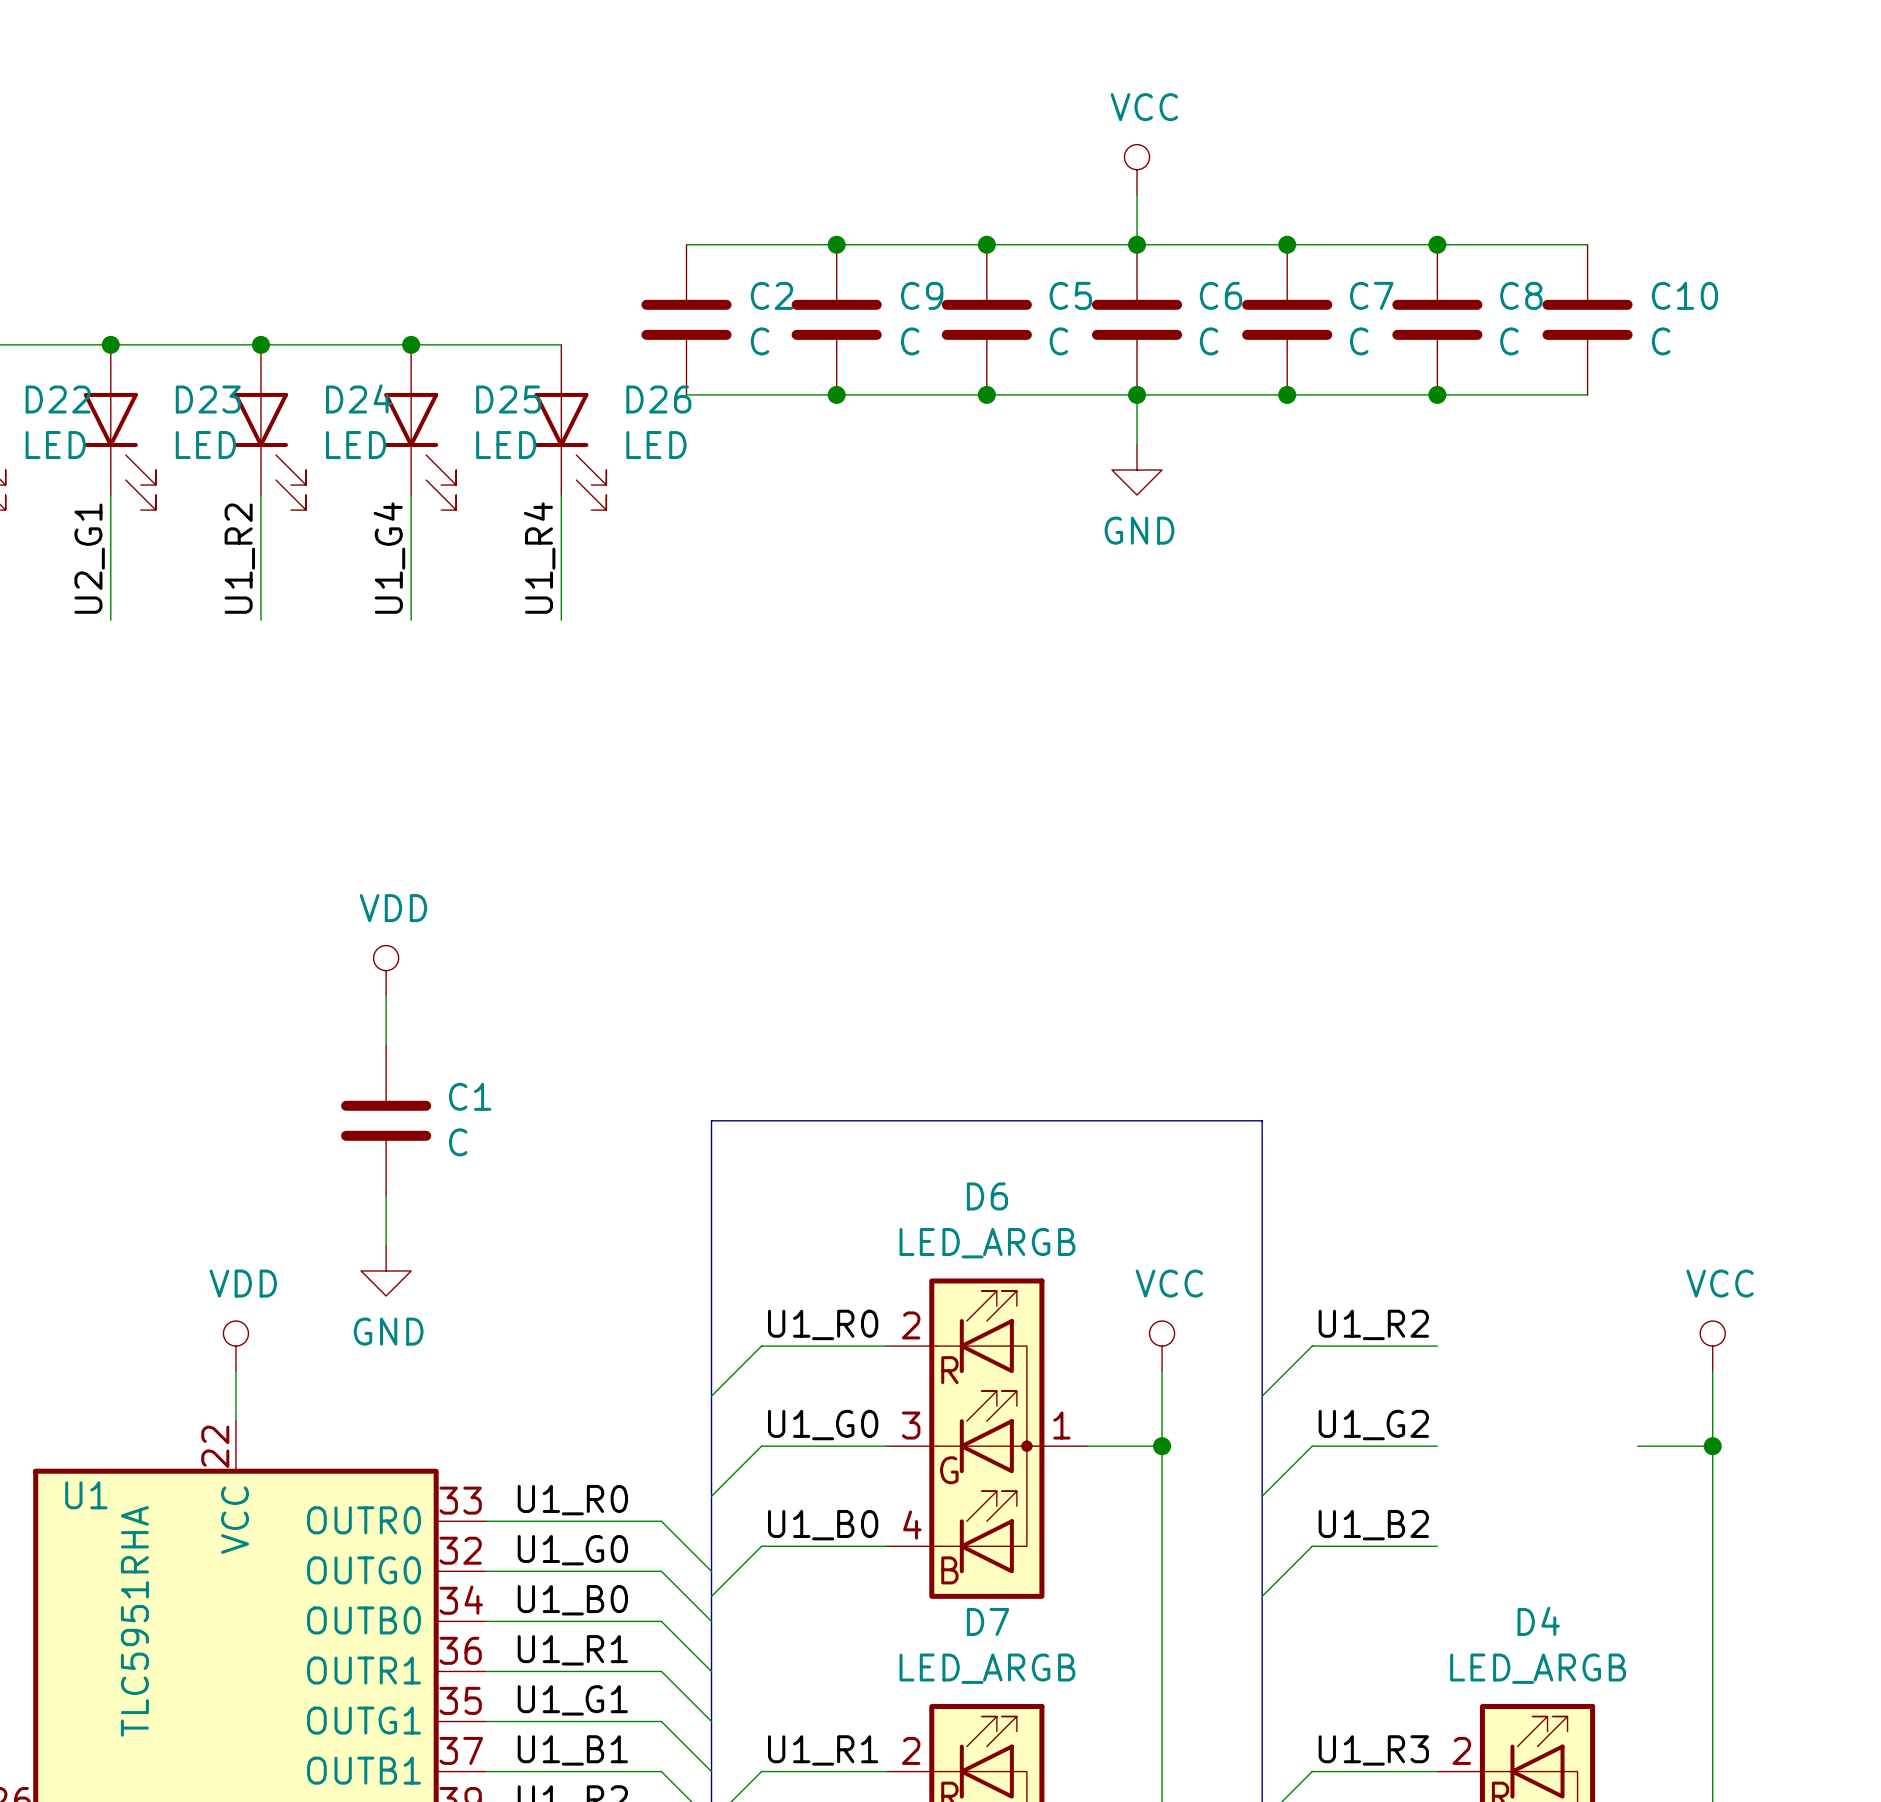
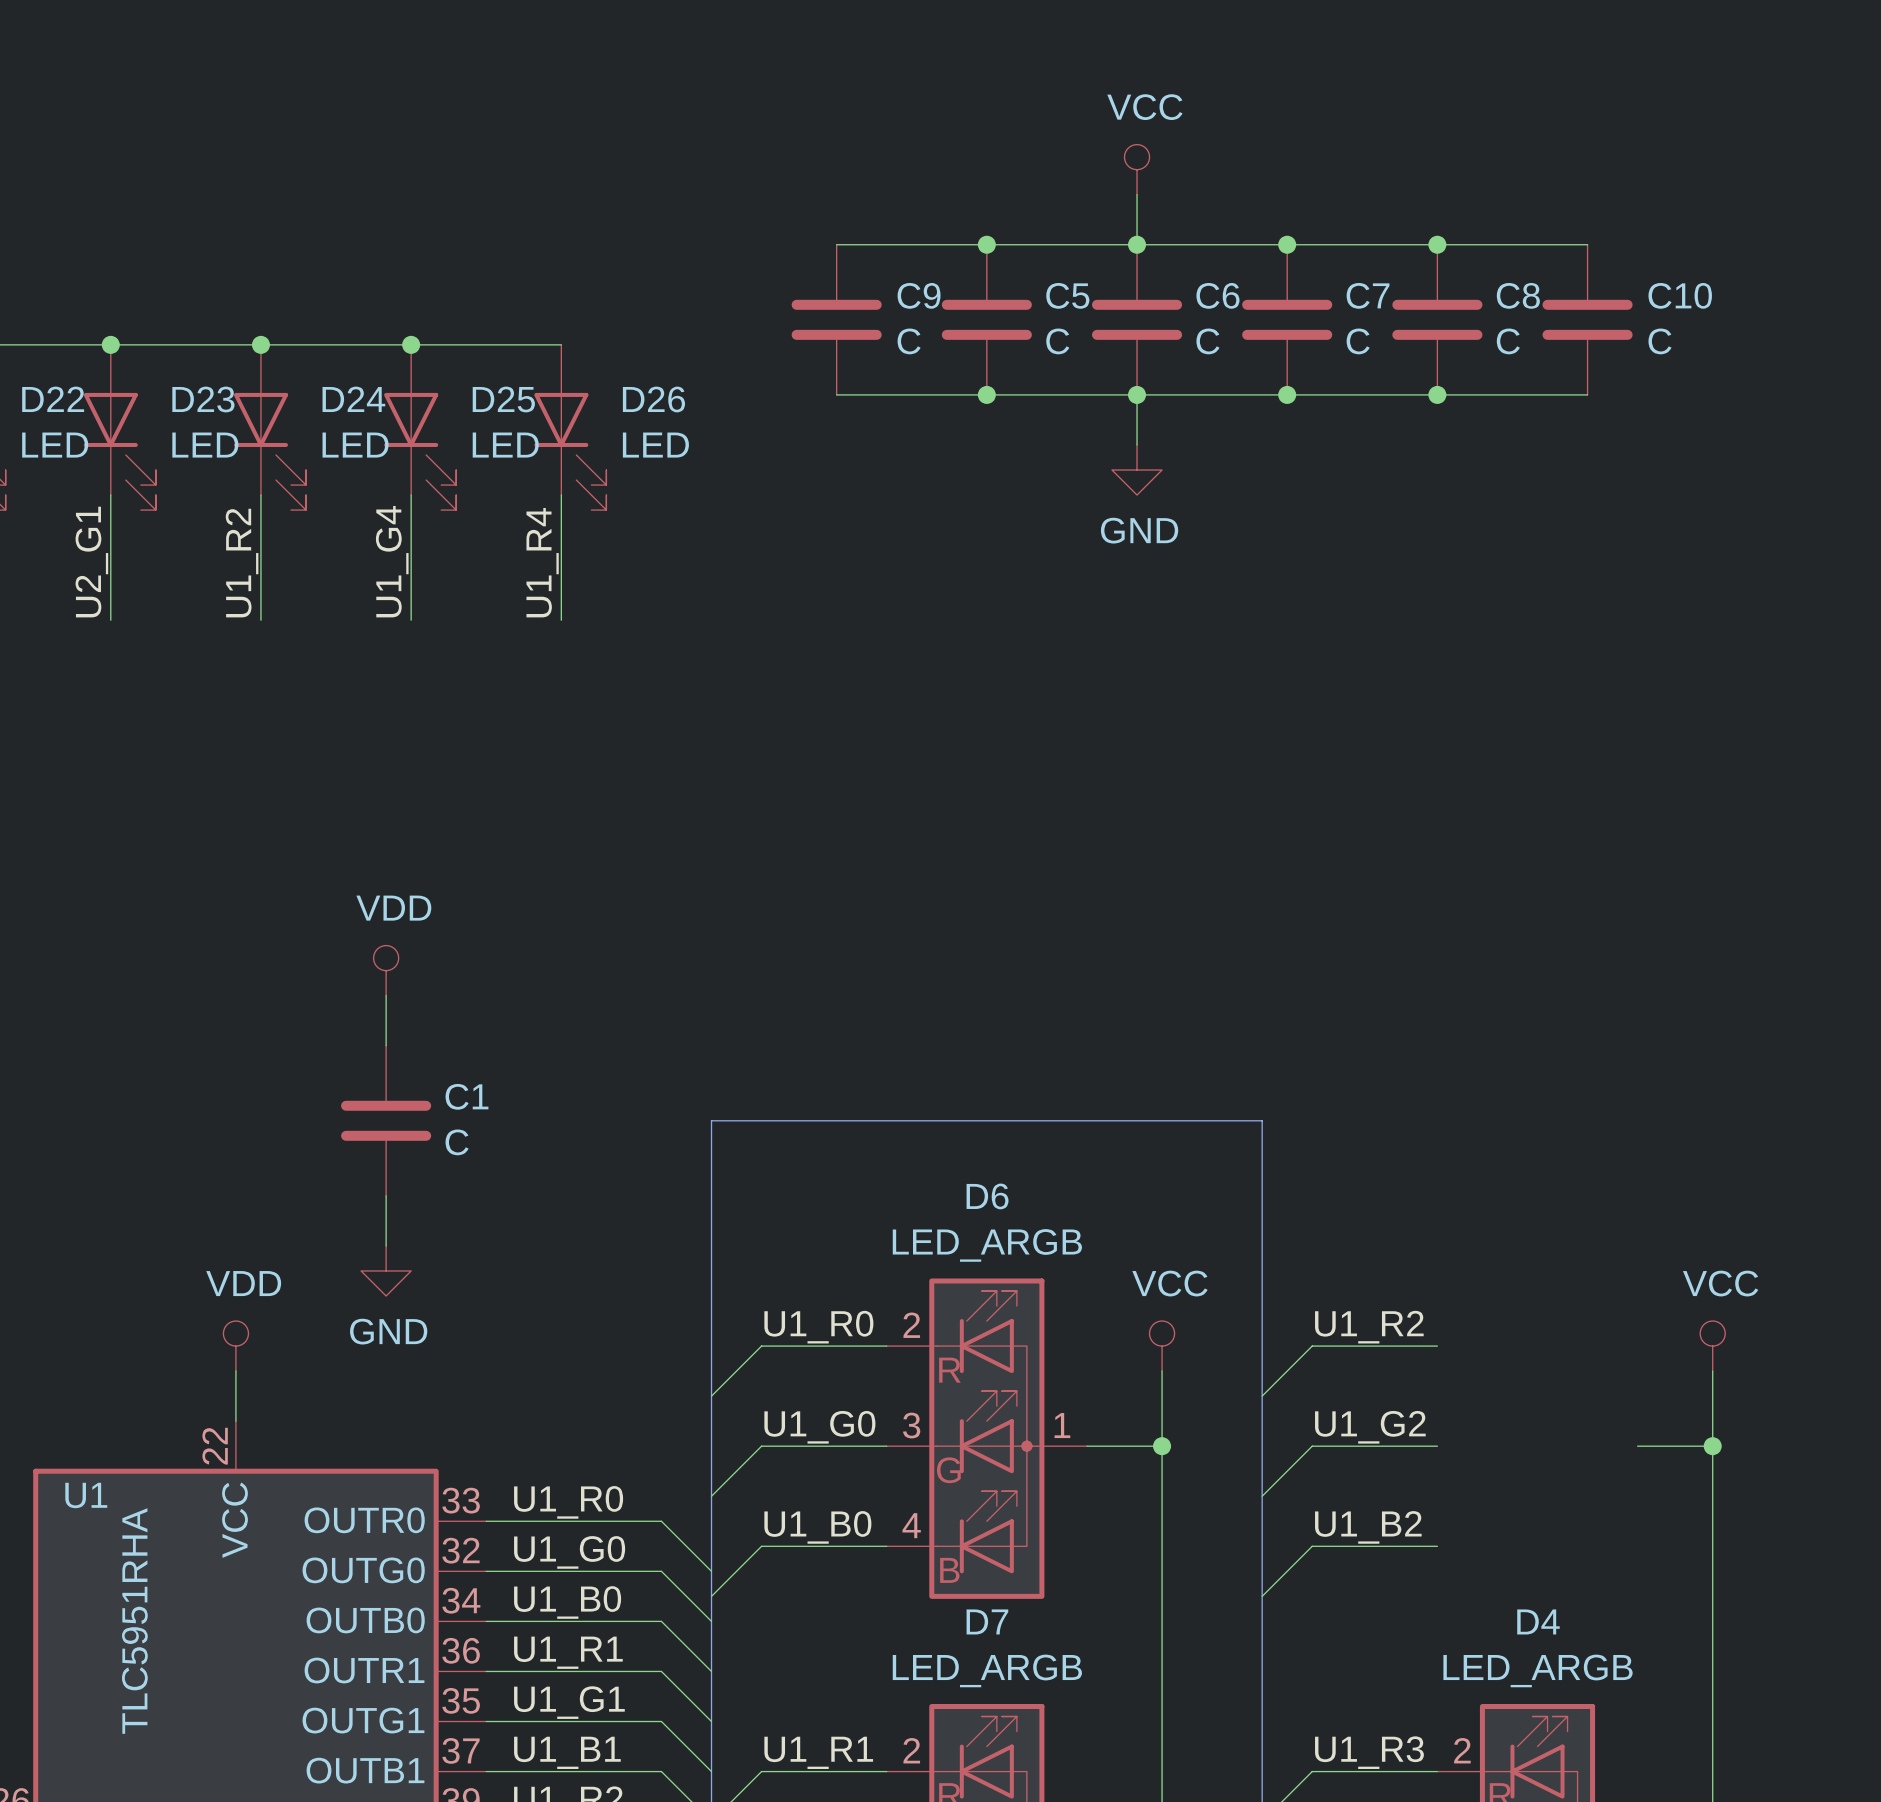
wire: (686, 244) (836, 244) -> none
junction: (836, 244) -> none
C2: C (686, 319) -> none
wire: (686, 394) (836, 394) -> none
junction: (836, 394) -> none

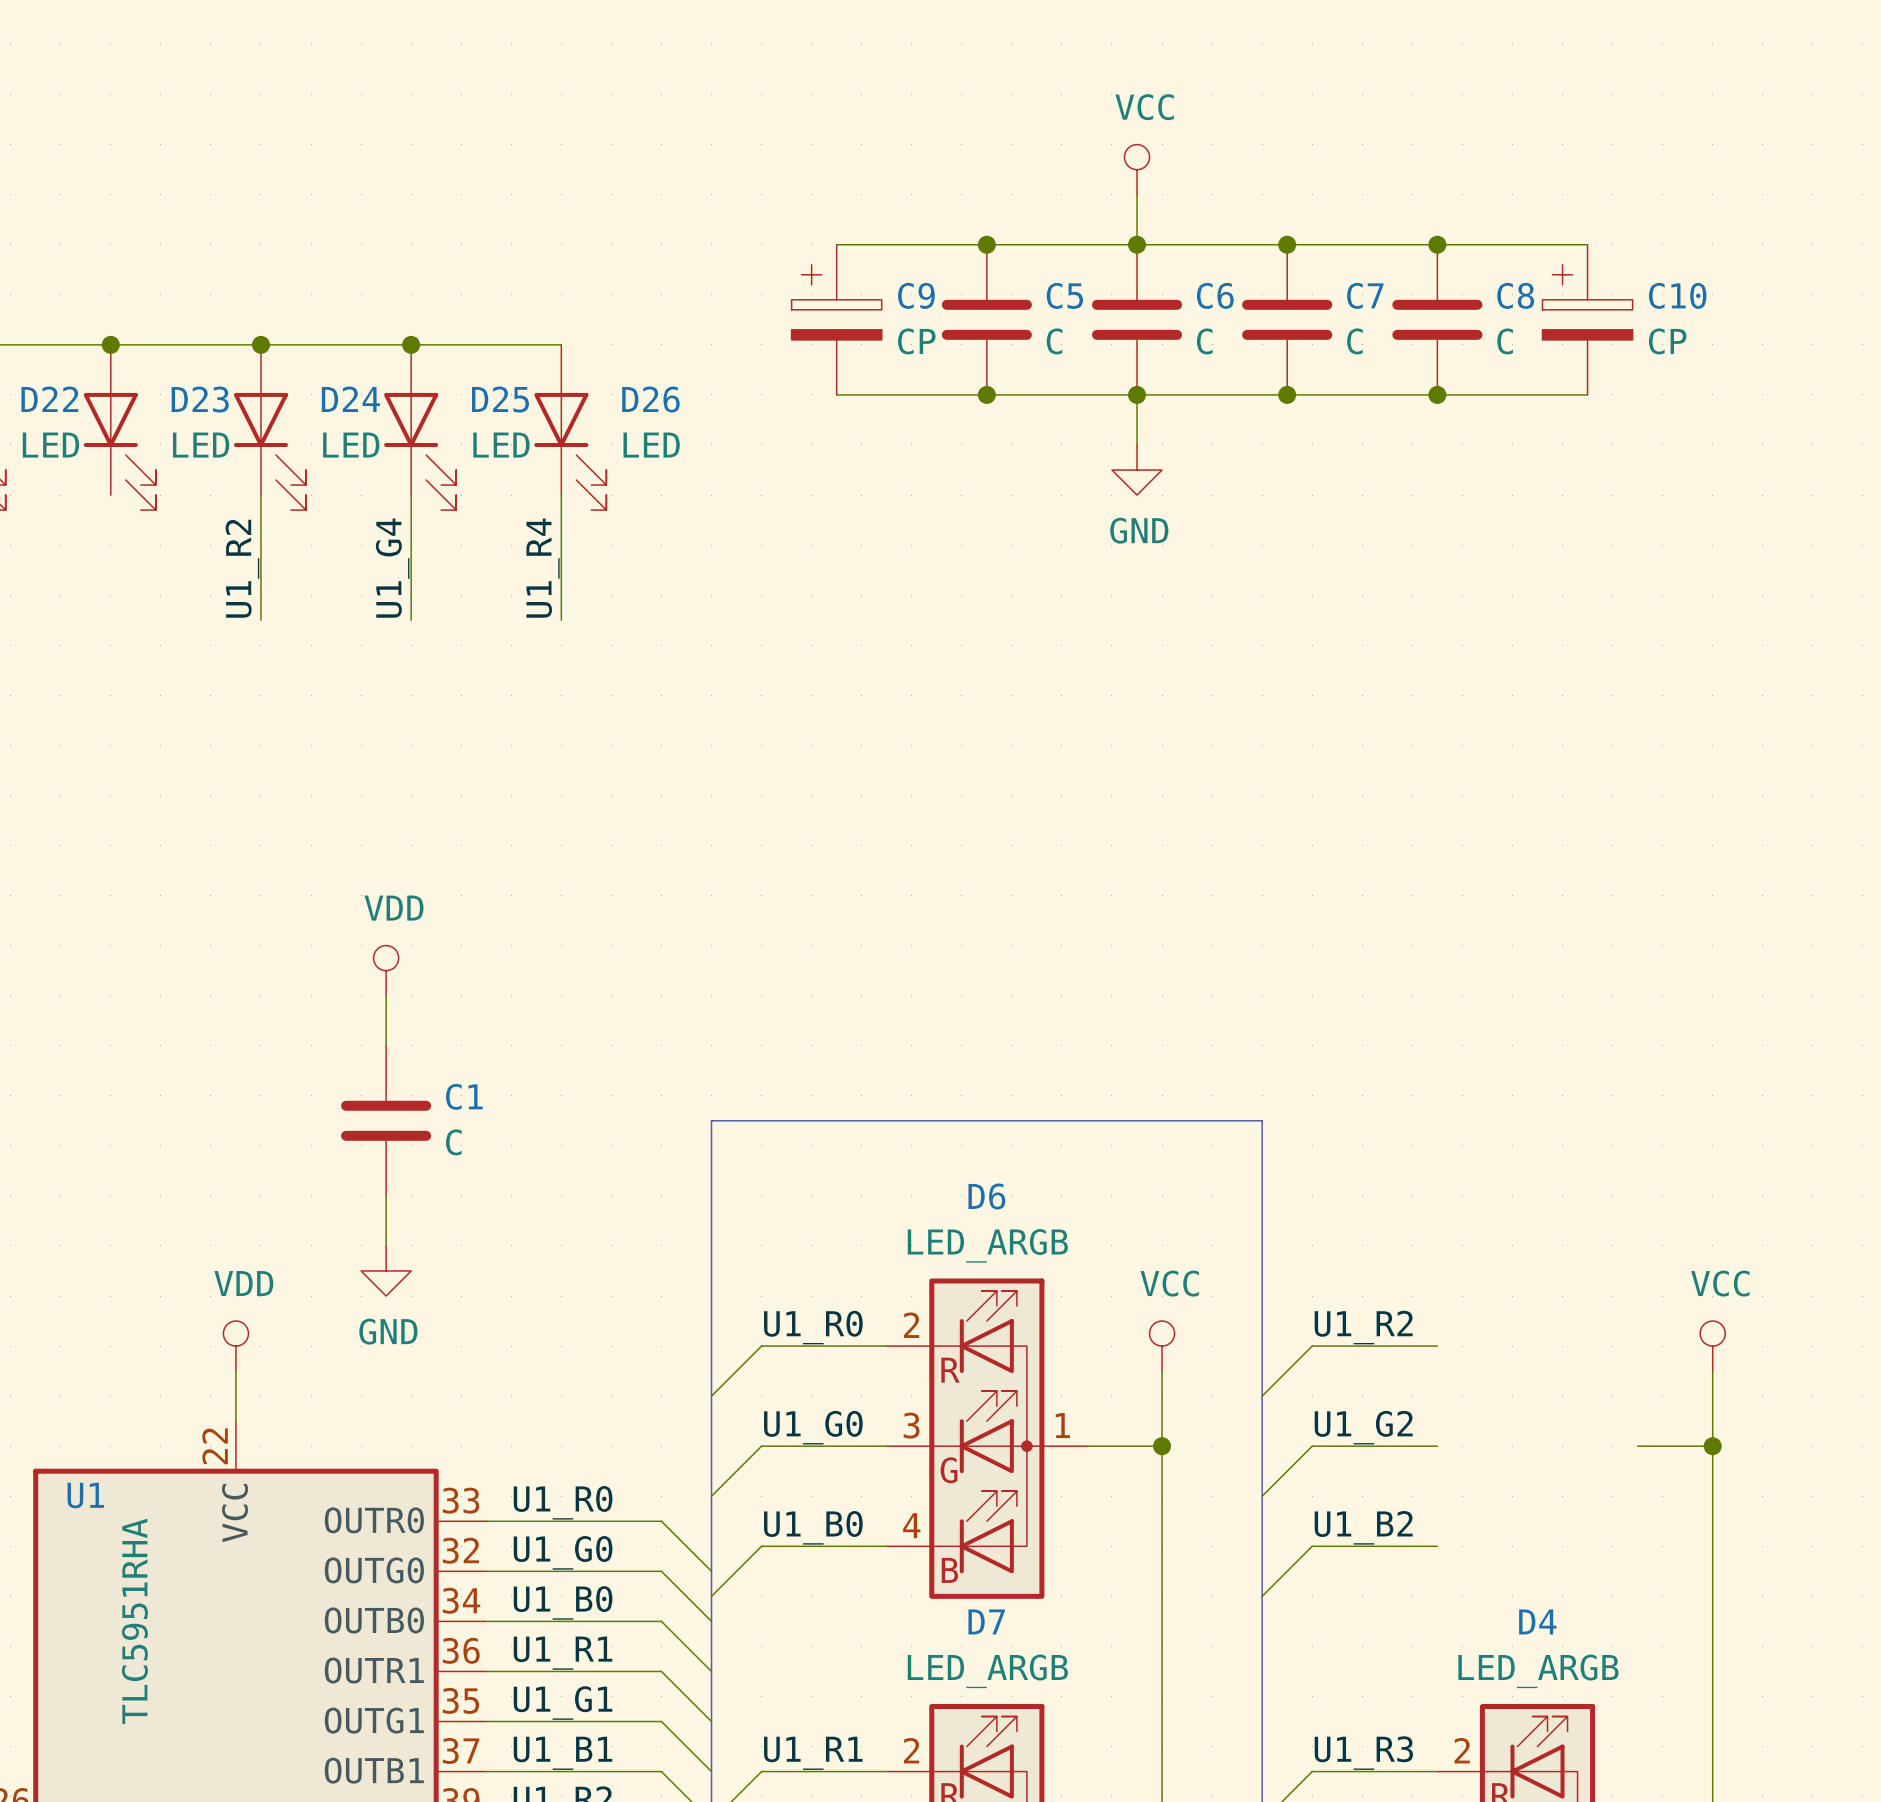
C9 symbol: [791, 244, 882, 395] -> [791, 244, 882, 395]
C10 symbol: [1542, 244, 1633, 395] -> [1542, 244, 1633, 395]
C9 value: C (909, 341) -> CP (916, 341)
C10 value: C (1660, 341) -> CP (1667, 341)
wire: (110, 495) (110, 620) -> none
label: U2_G1 (91, 562) -> none

